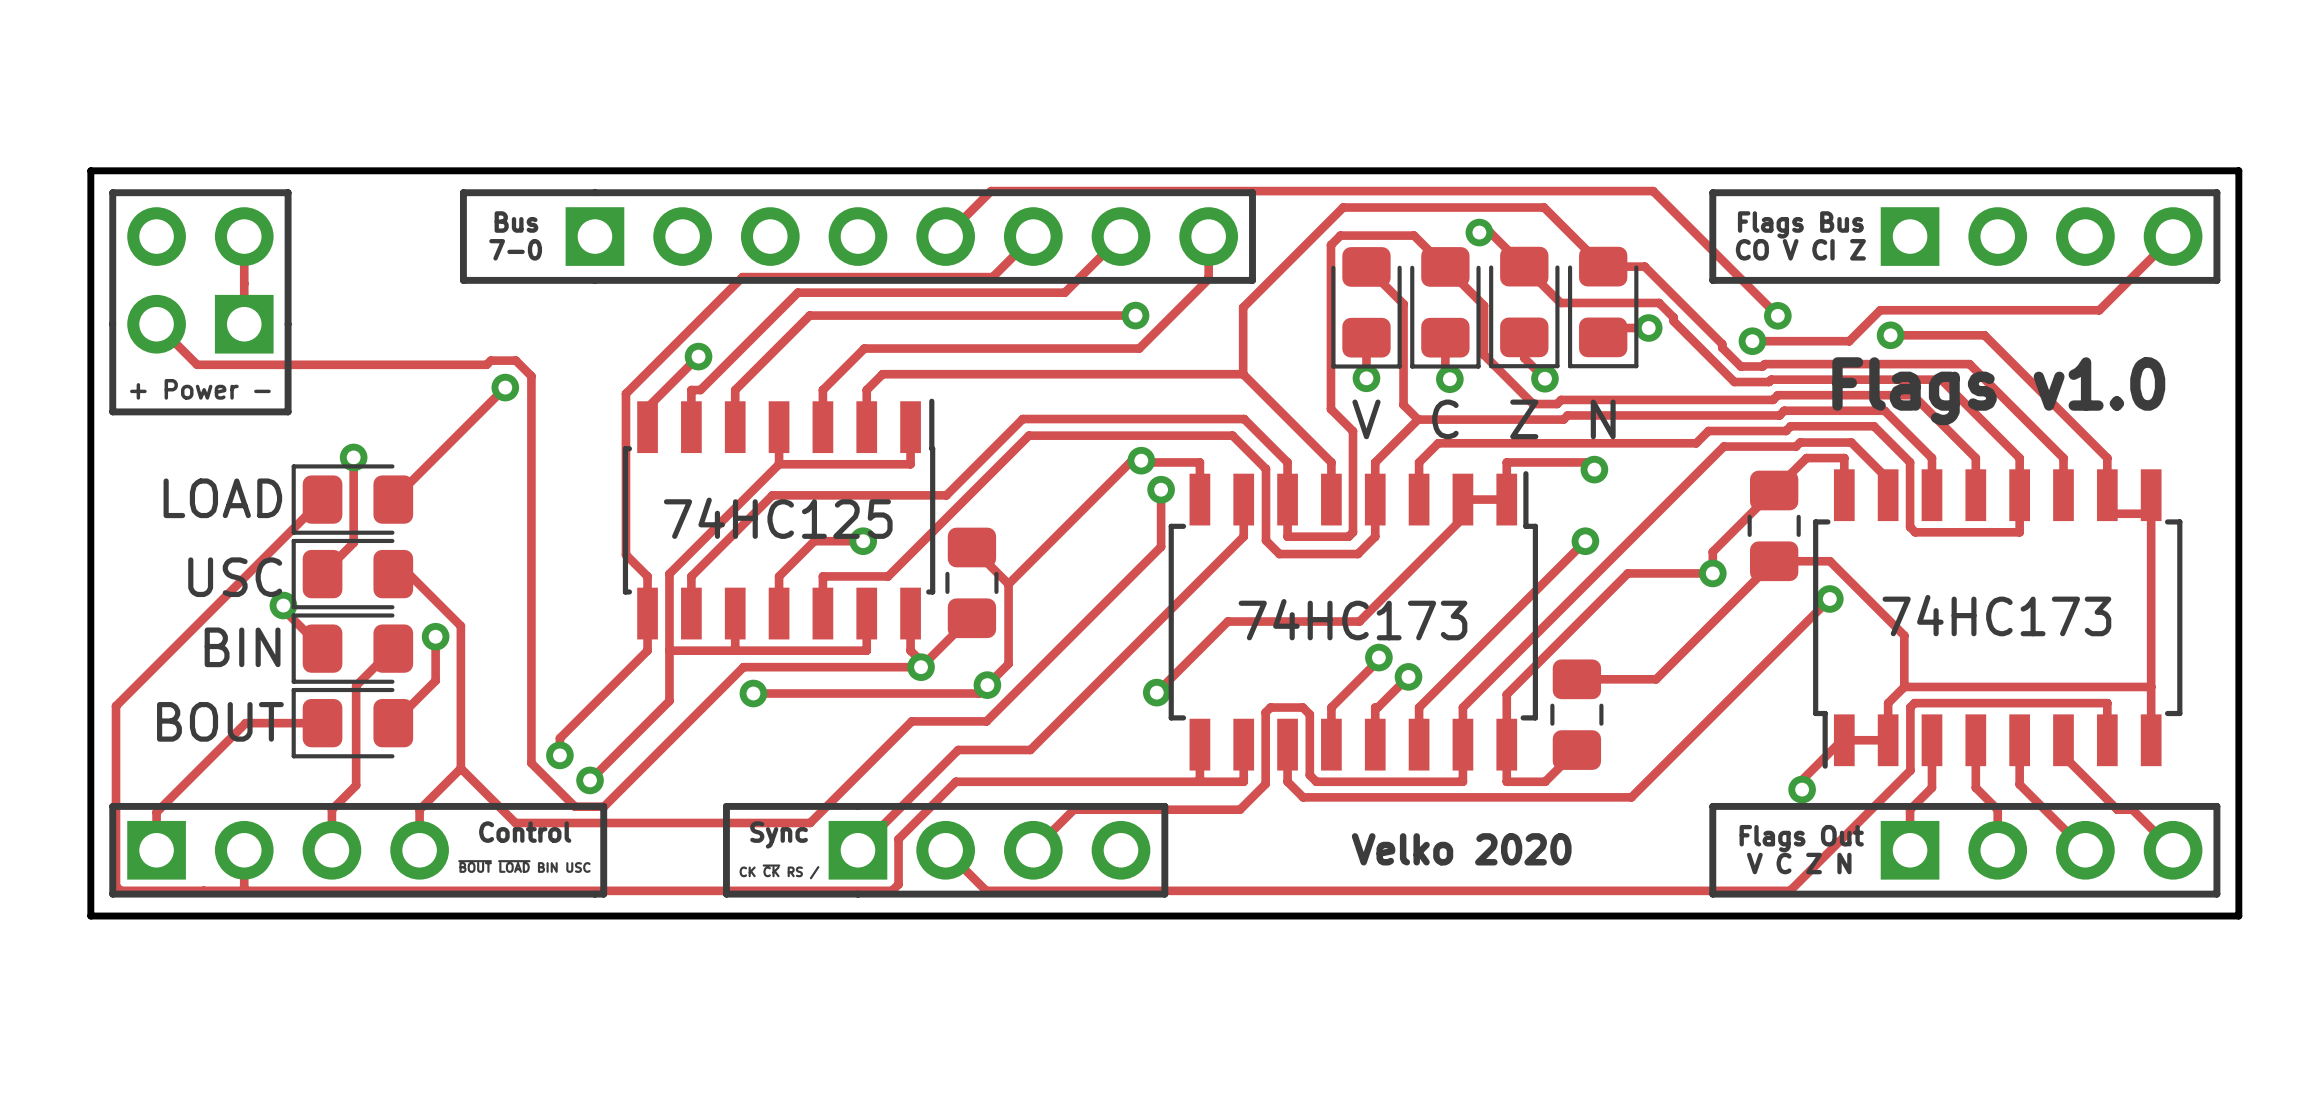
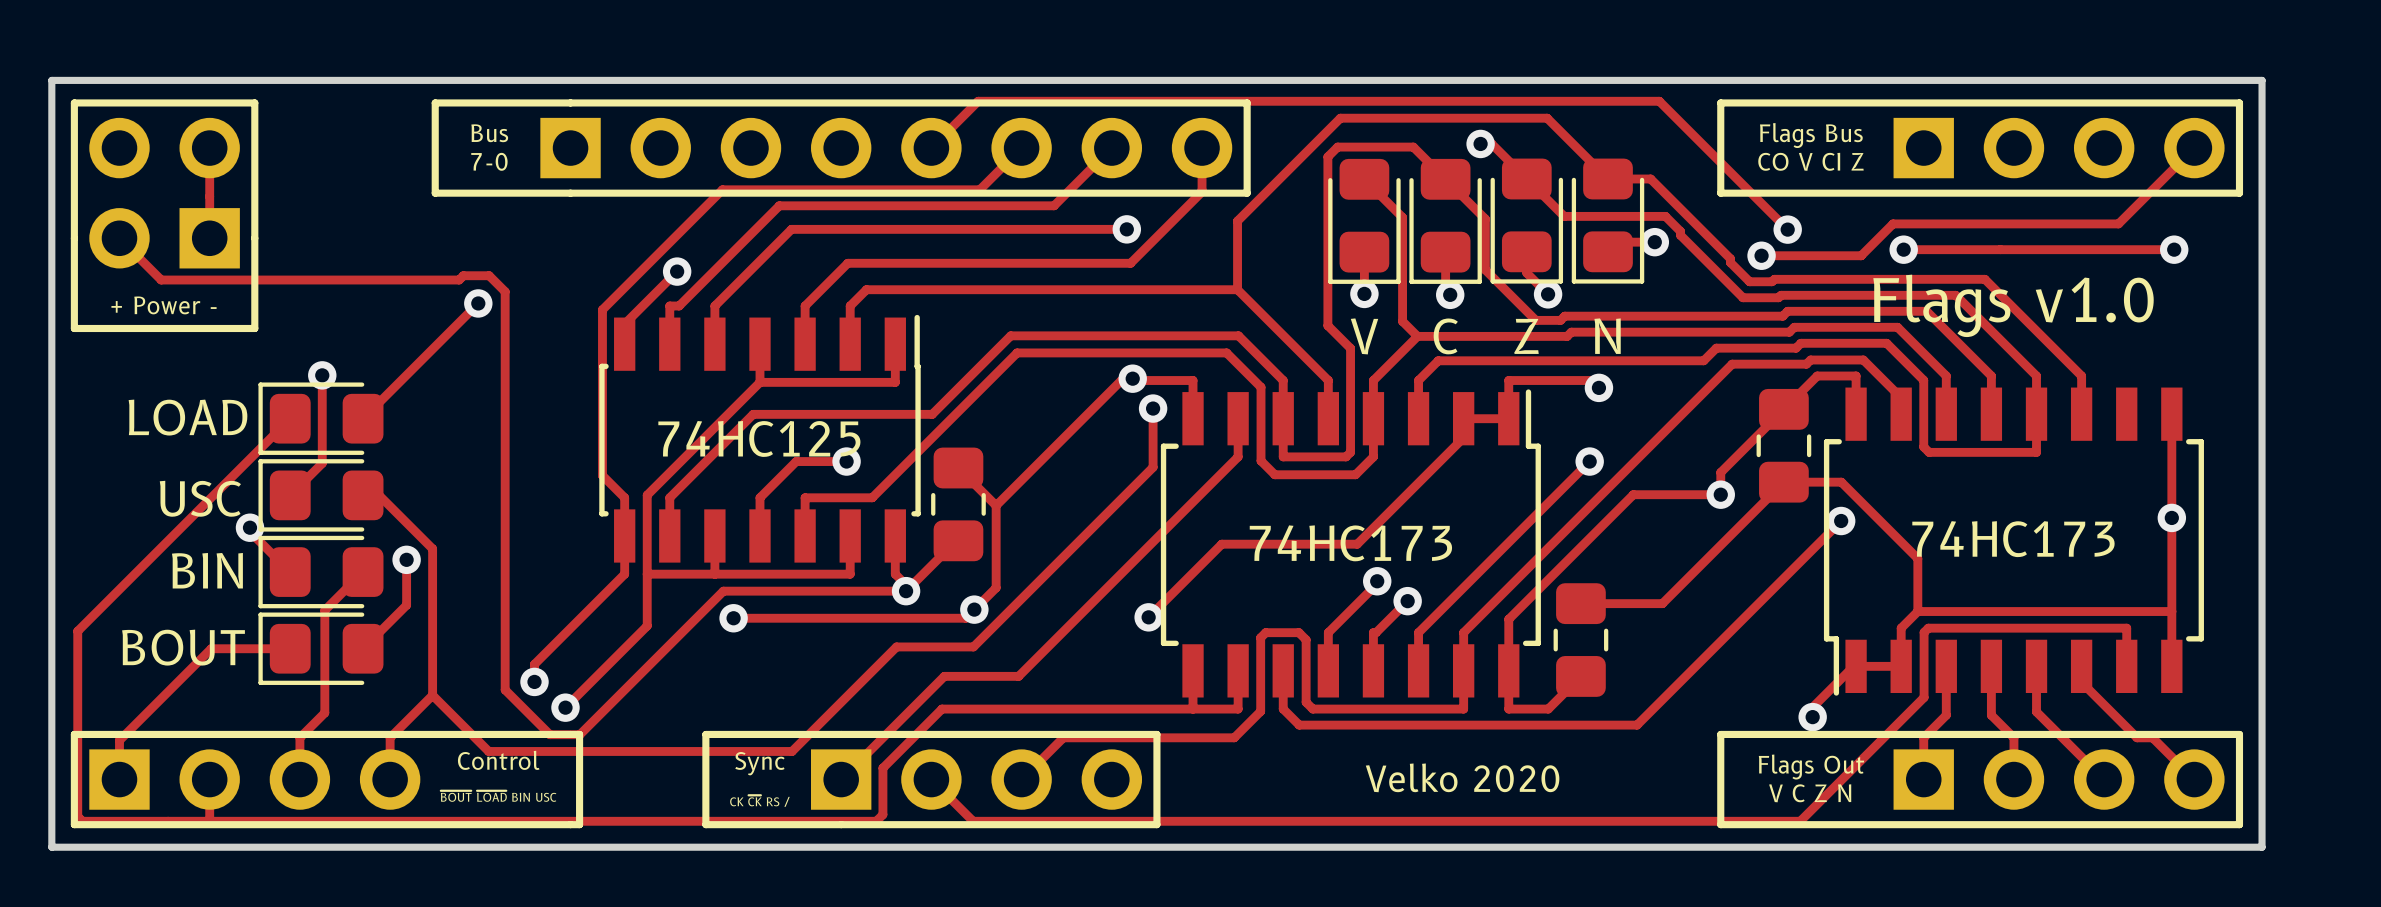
track: (1984, 335) (2107, 458) (2107, 495) -> (2000, 249) (2174, 249)
via: none -> (2174, 249)
track: (2107, 513) (2151, 513) -> none
via: none -> (2171, 517)

